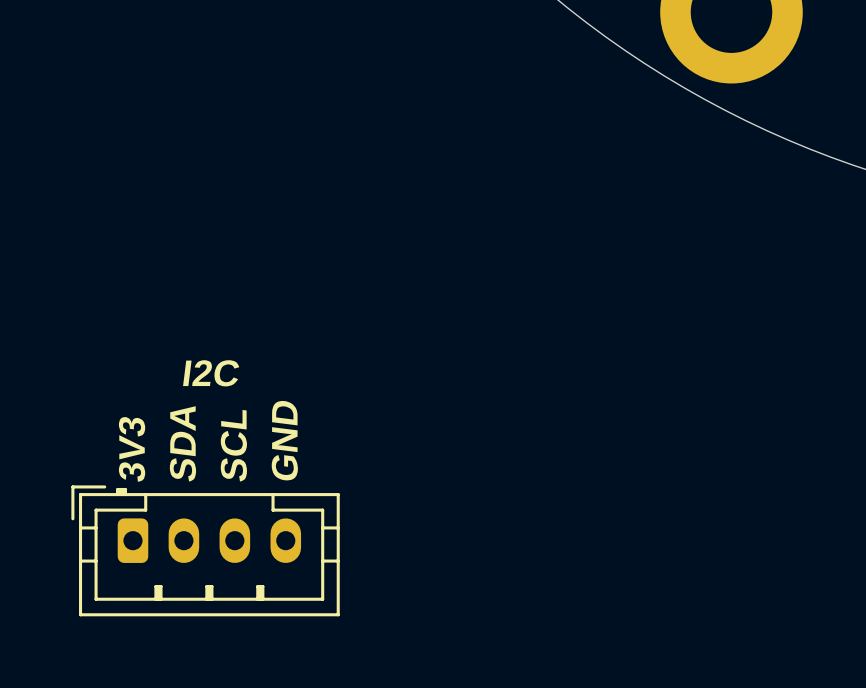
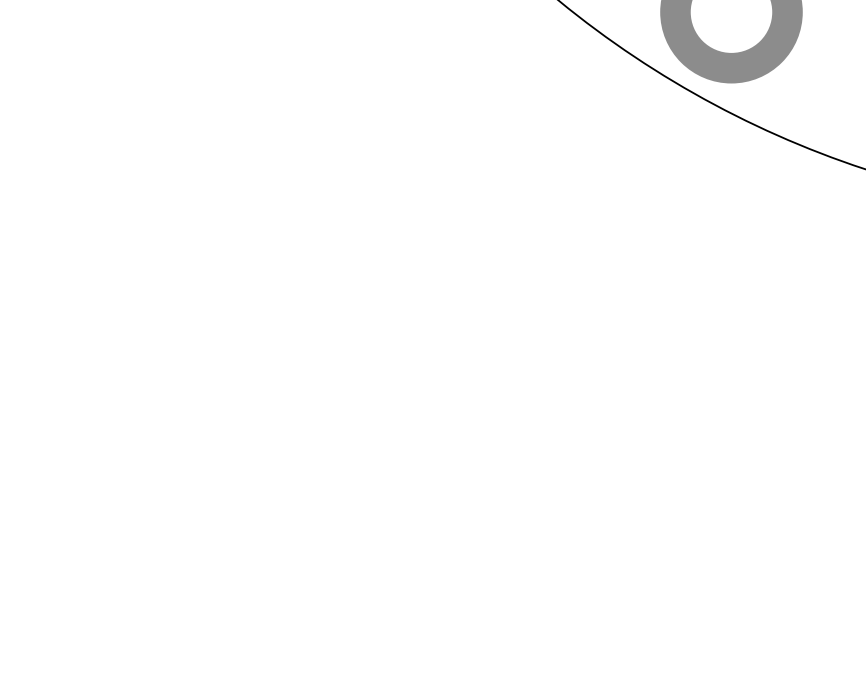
text: I2C (211, 373) -> none
text: GND (284, 440) -> none
text: SDA (182, 443) -> none
text: SCL (233, 445) -> none
text: 3V3 (132, 449) -> none
part: (205, 550) -> none

